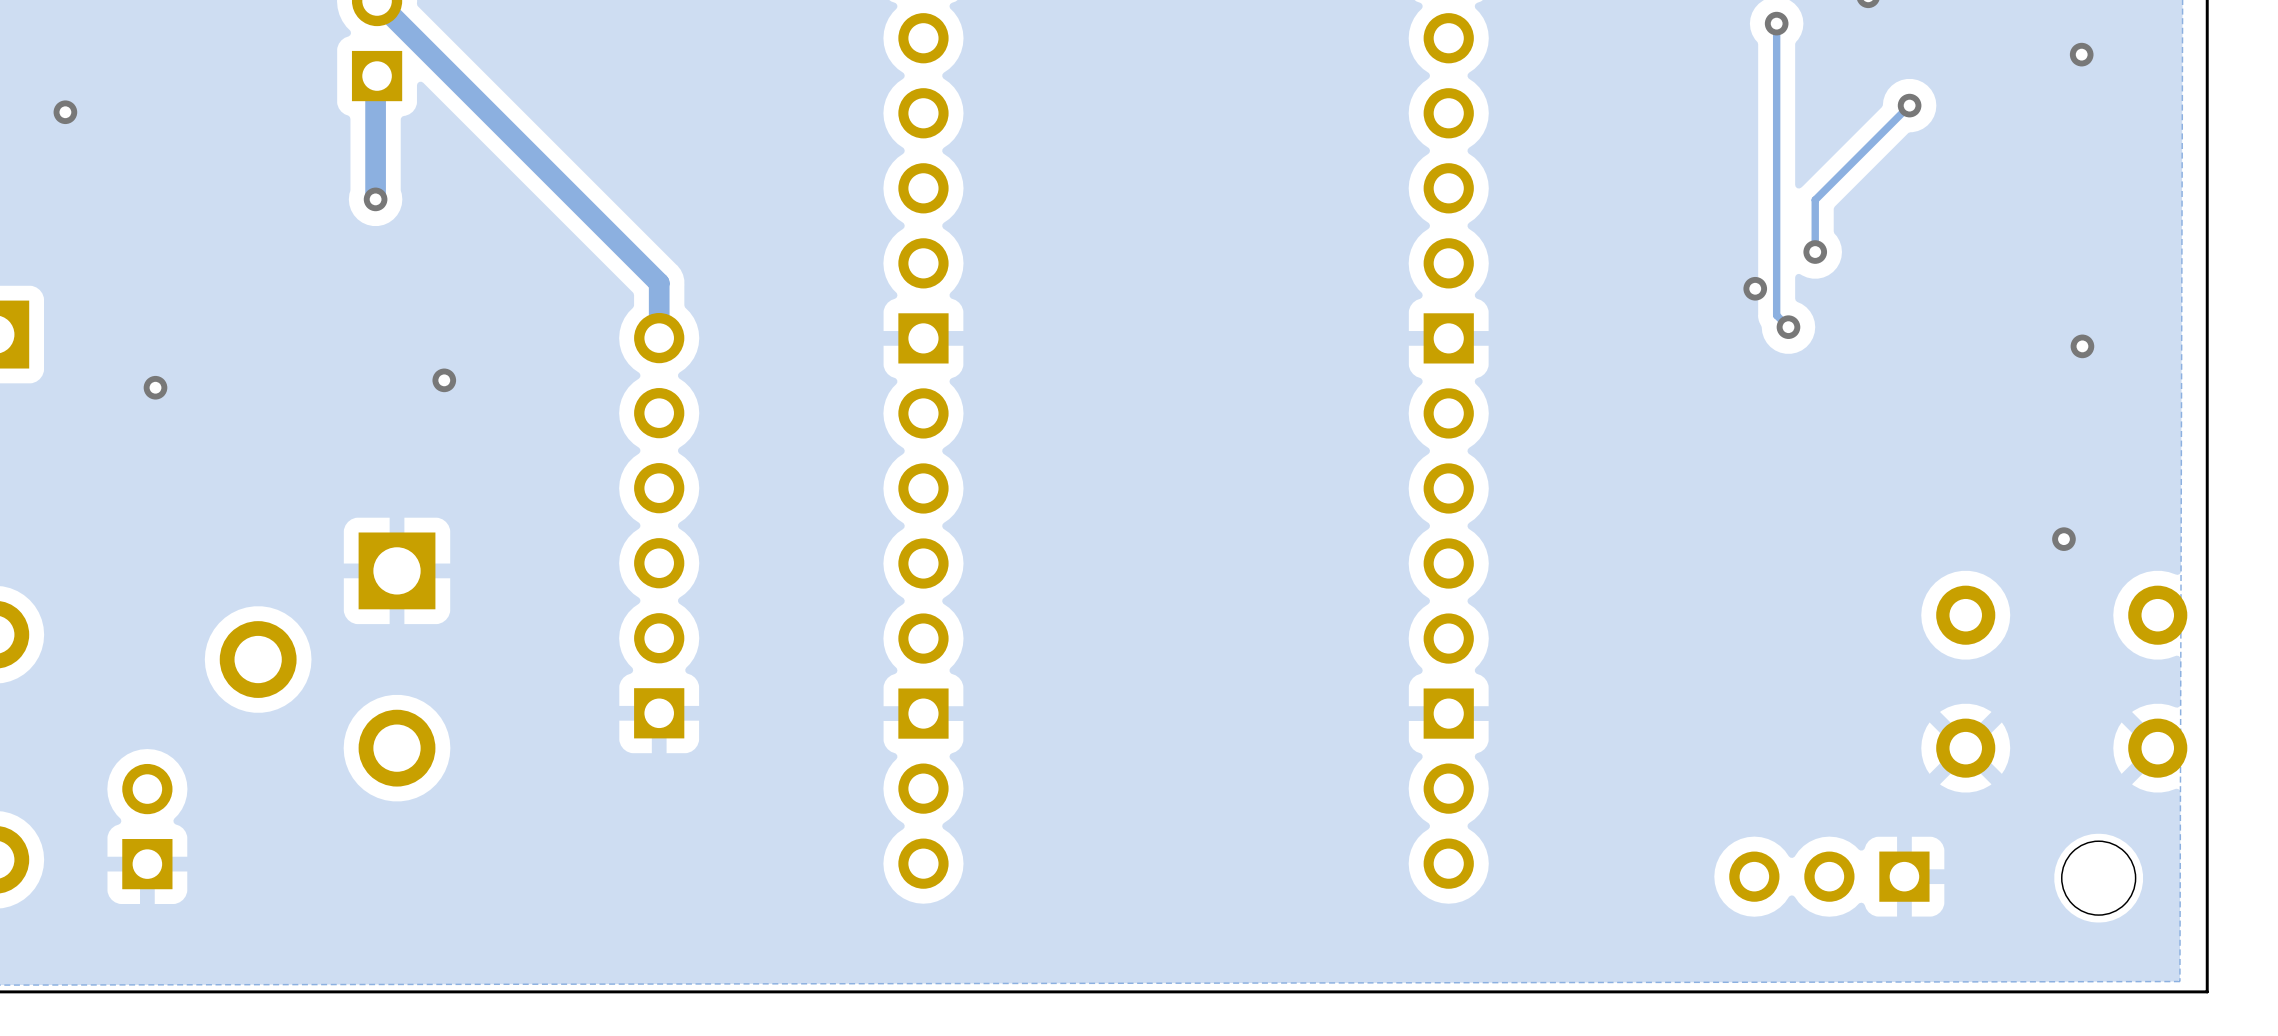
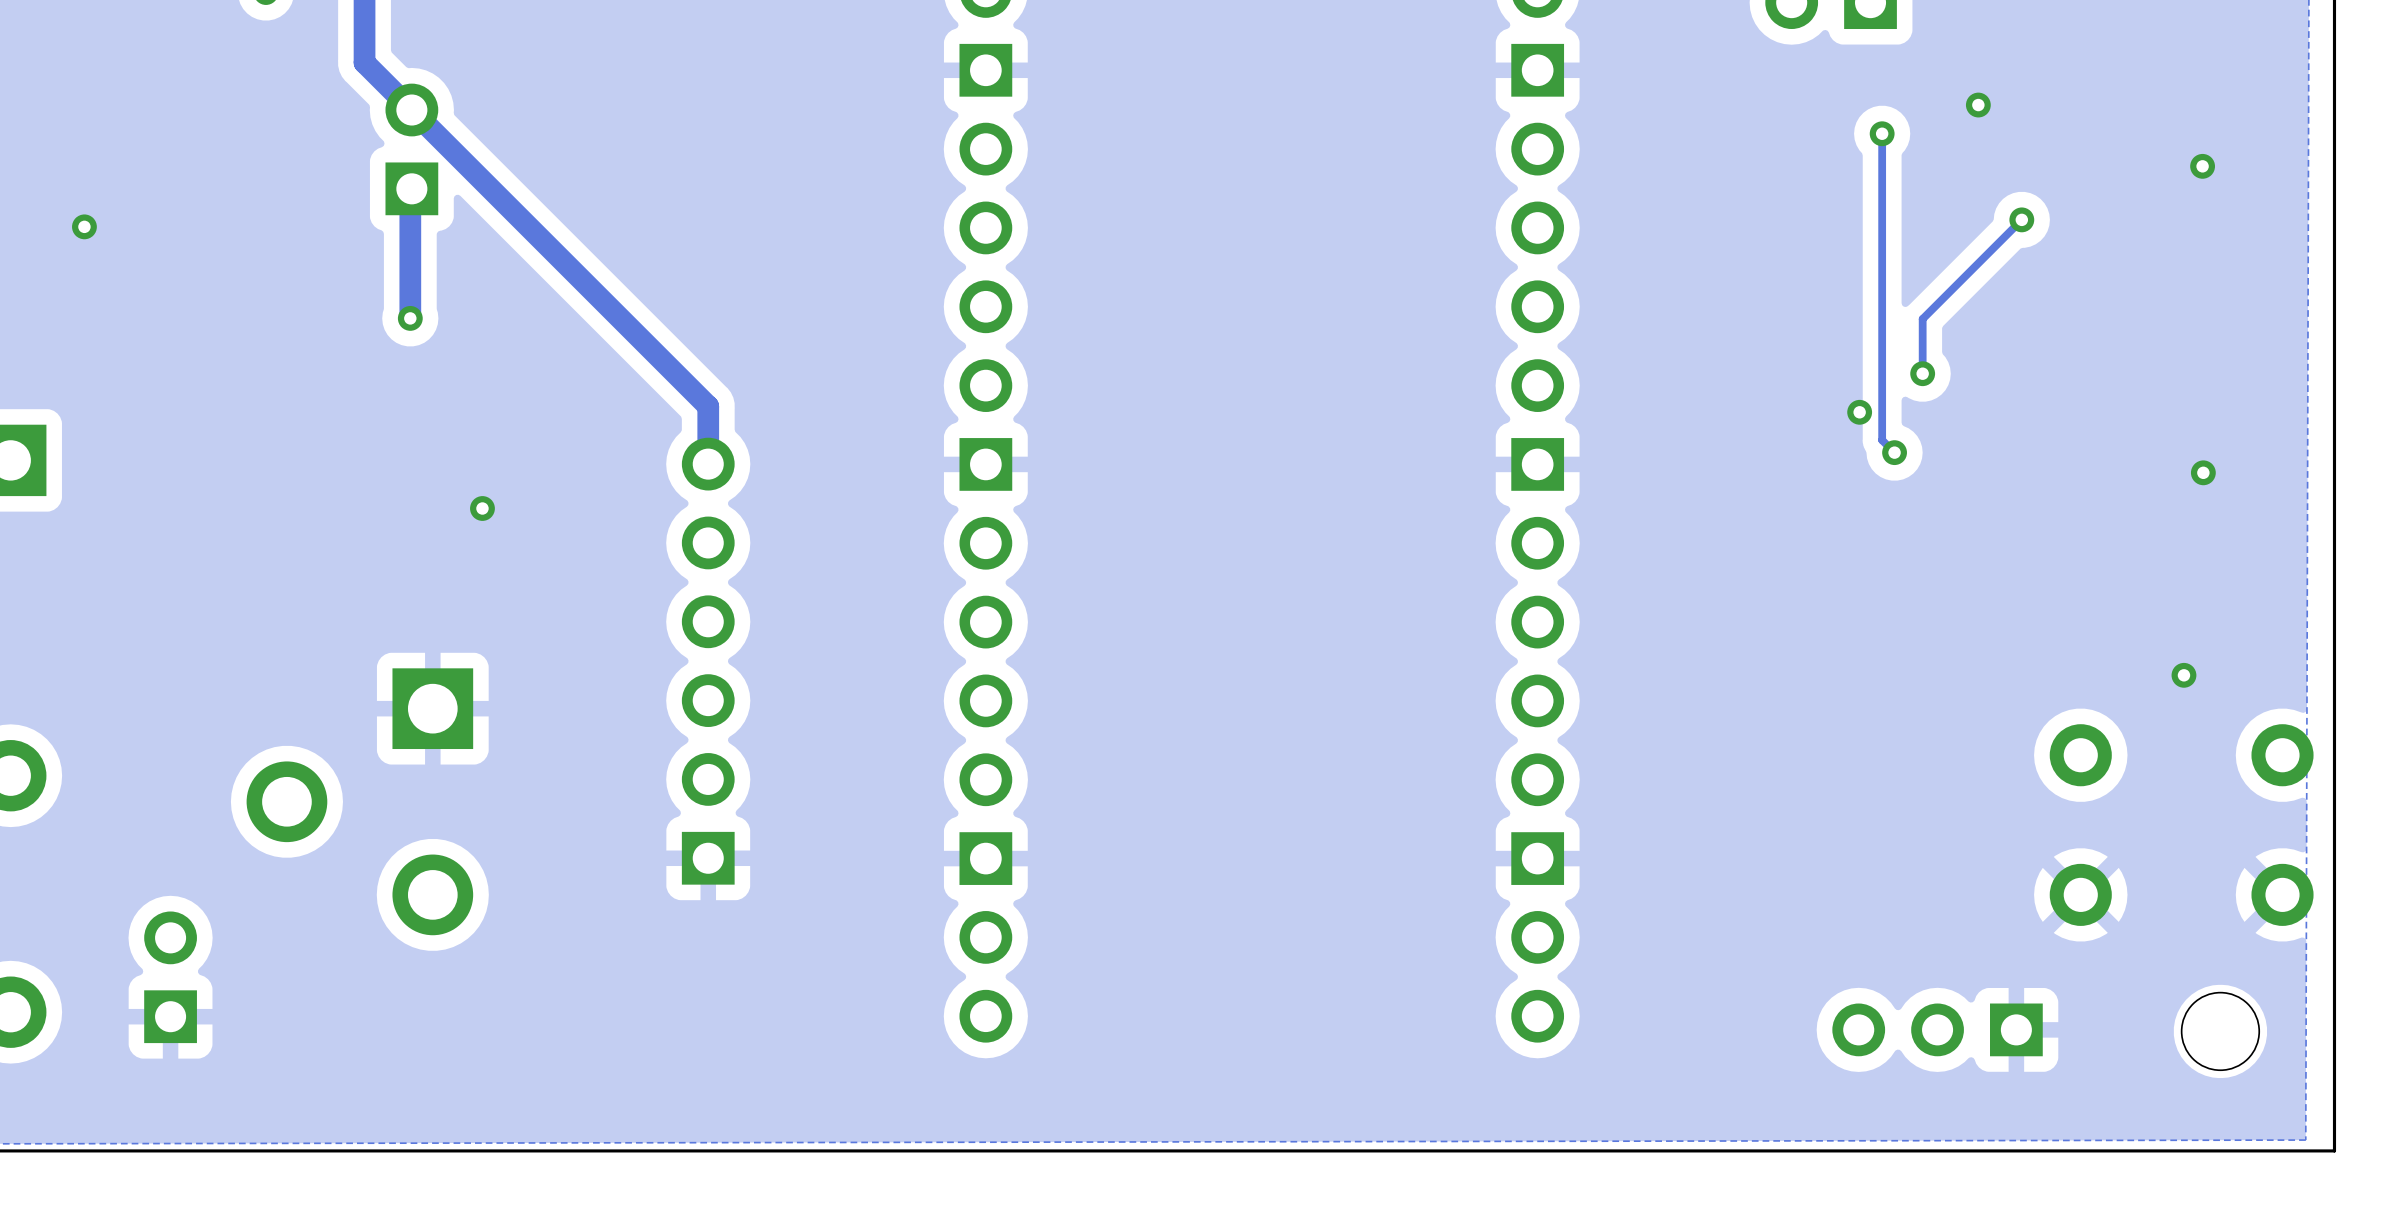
via: (155, 387) -> none

